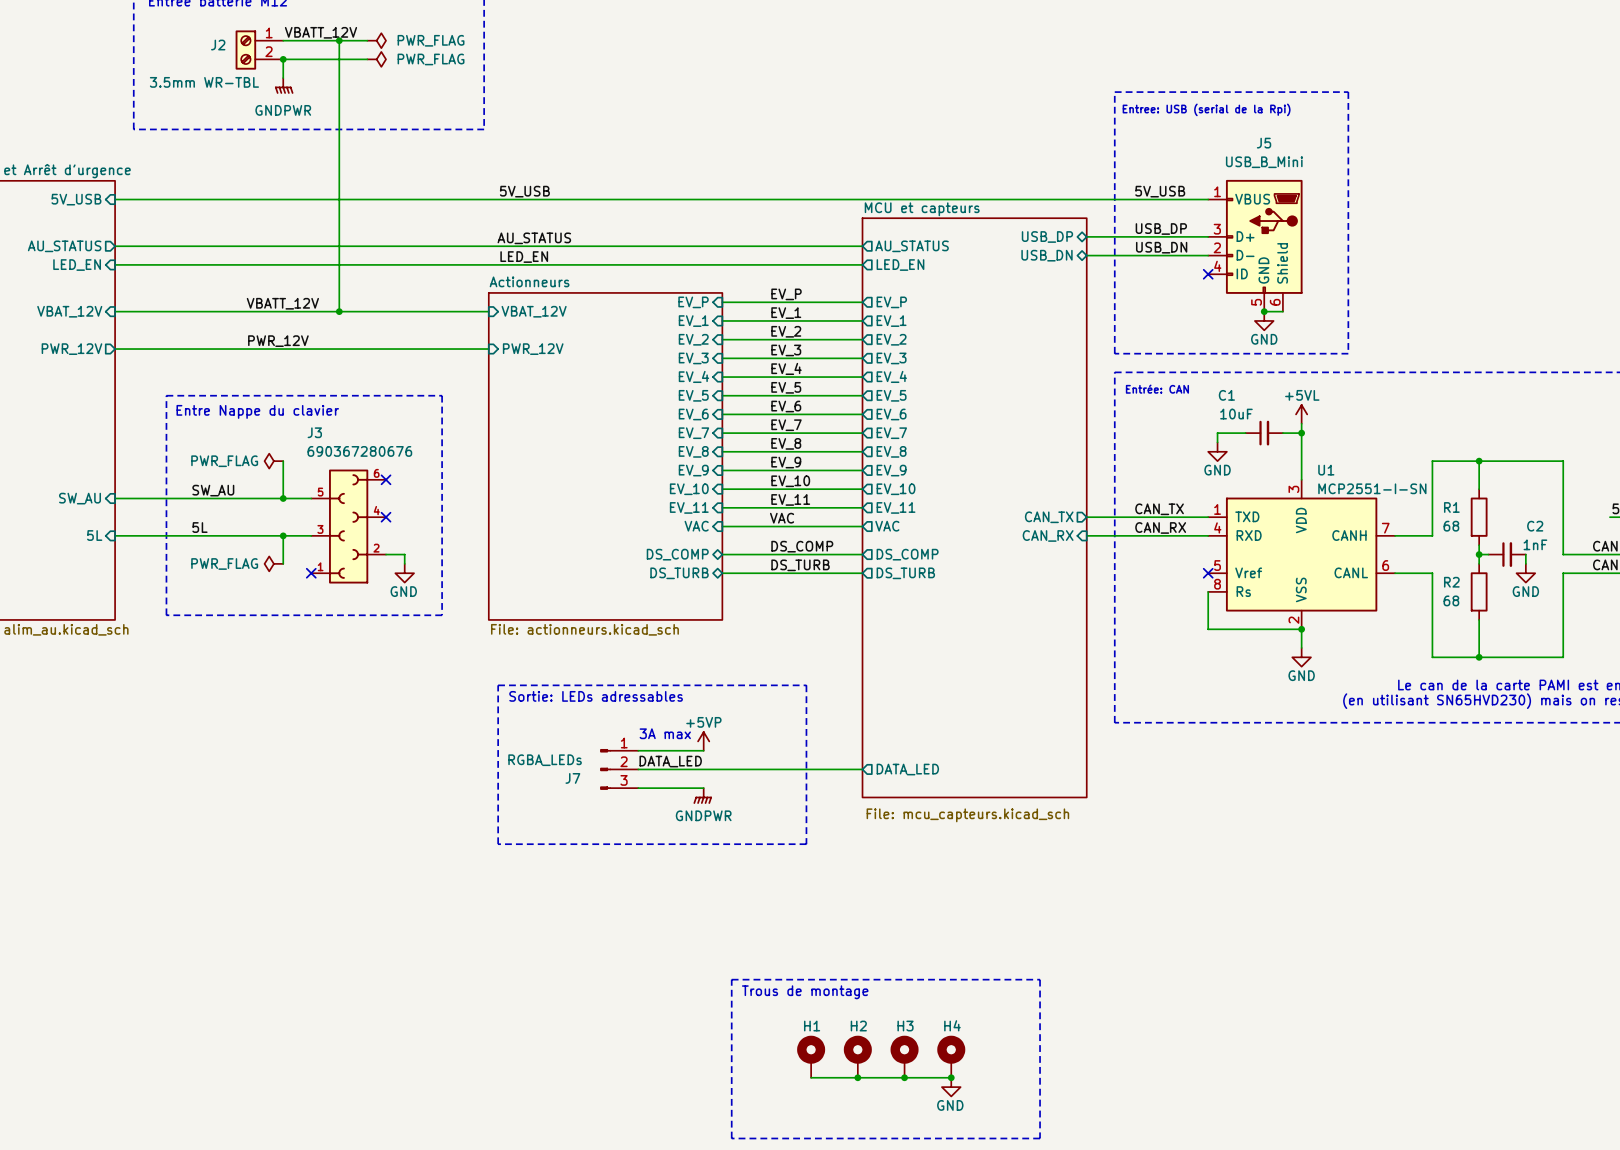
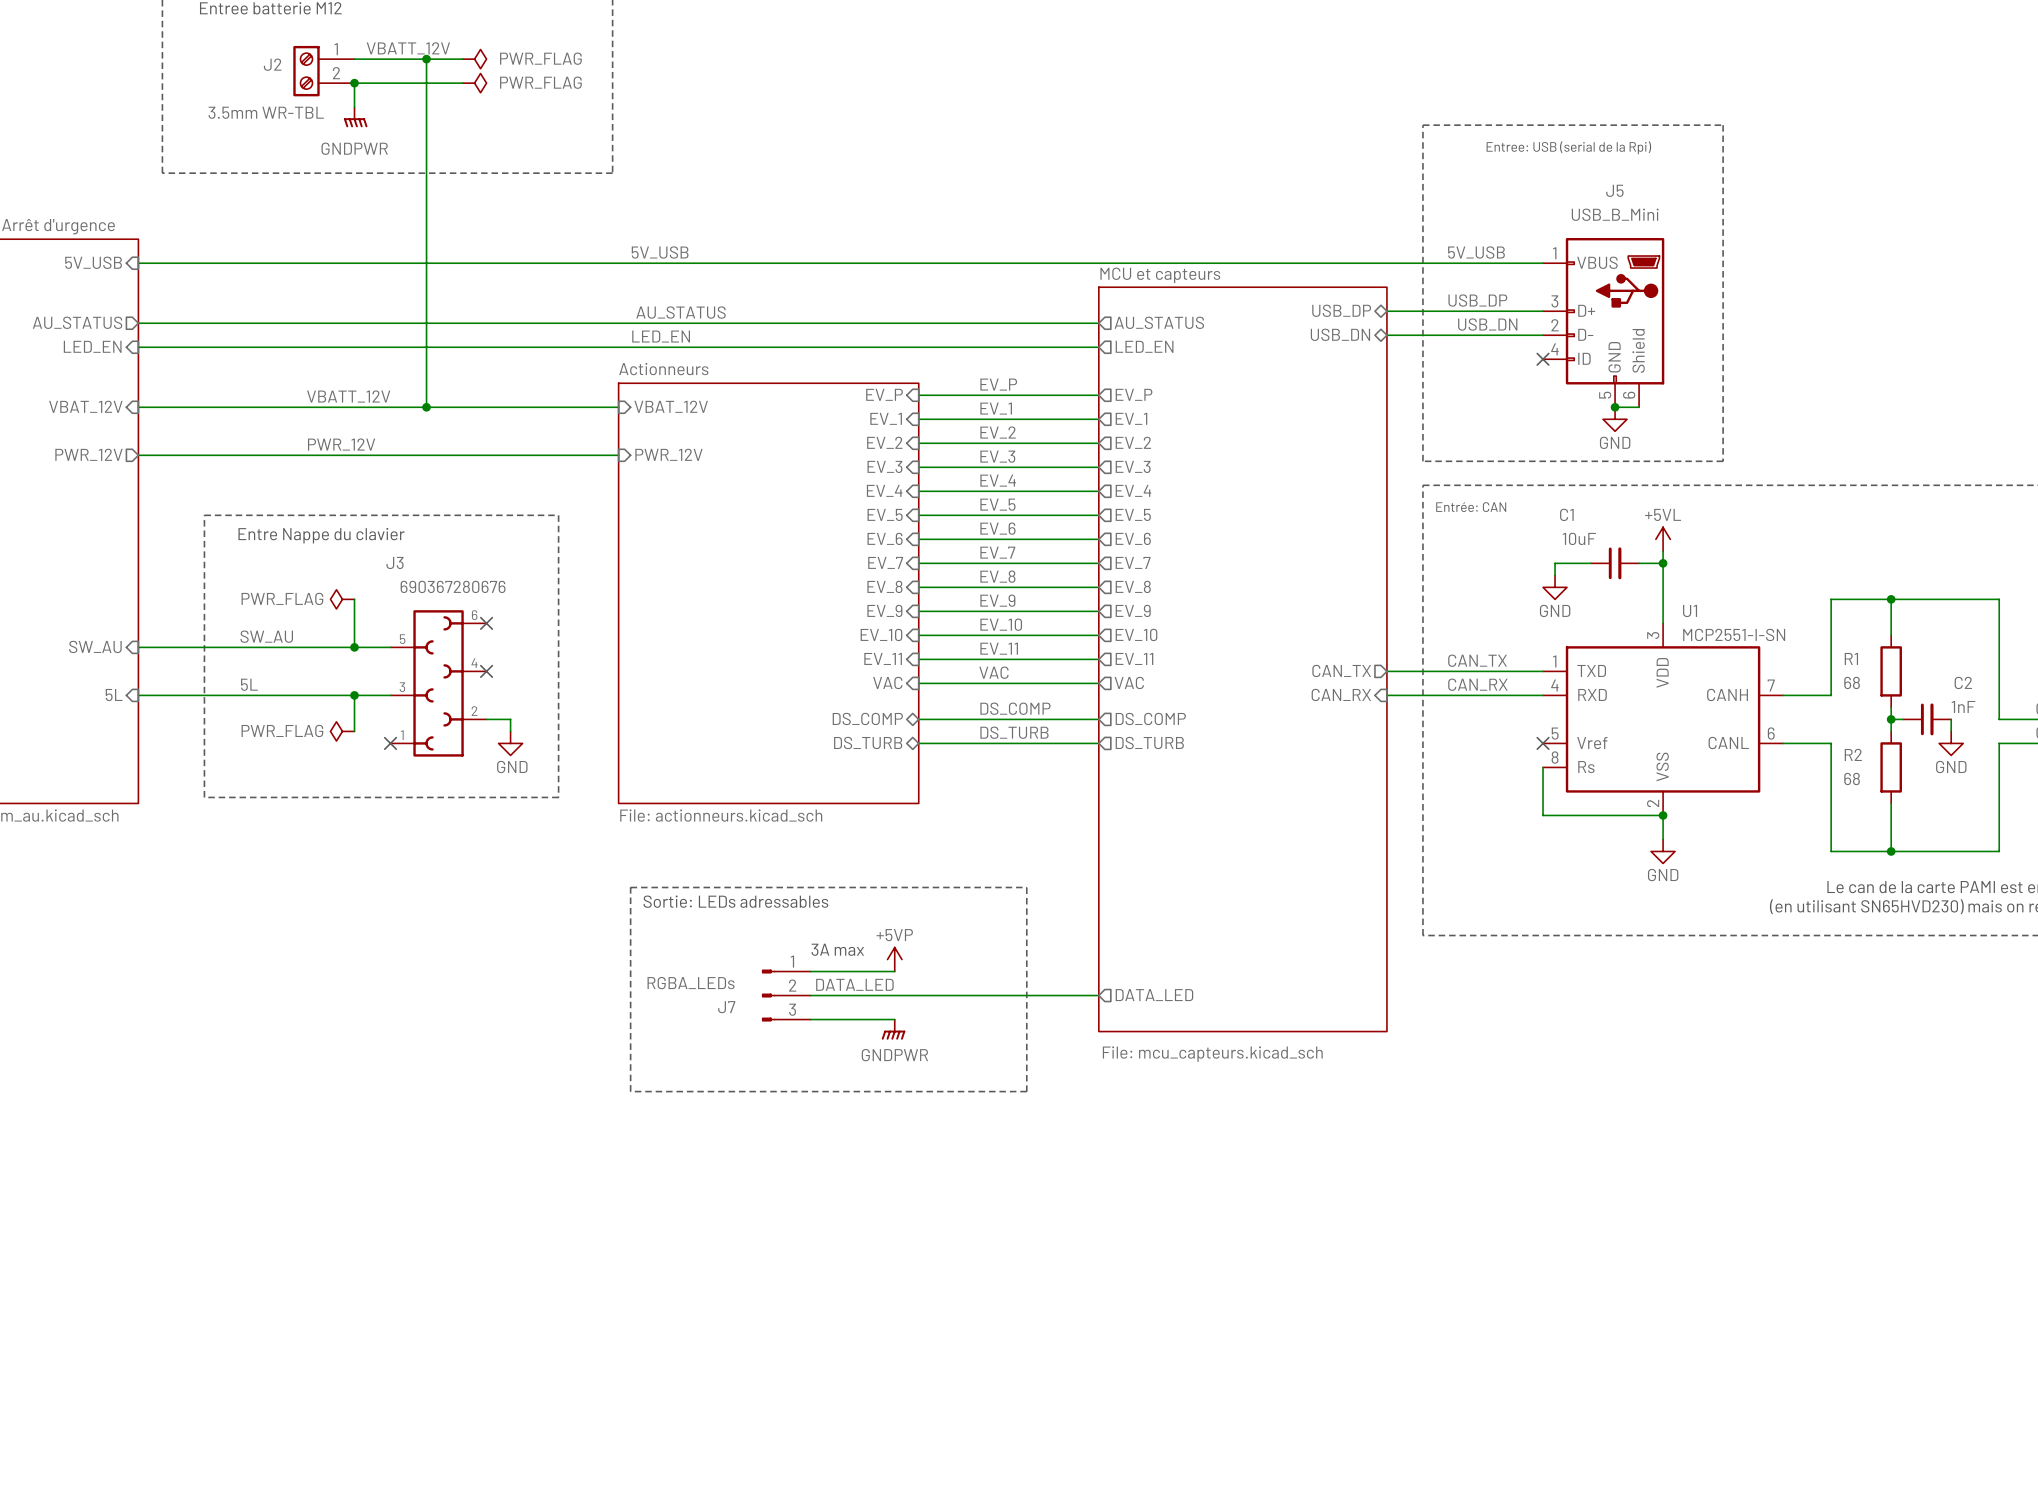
line: (731, 979) (1040, 979) (1040, 1138) (731, 1138) (731, 979) -> none
text: Trous de montage (805, 992) -> none
H1: (811, 1056) -> none
H2: (857, 1056) -> none
H3: (904, 1056) -> none
H4: (951, 1056) -> none
wire: (811, 1077) (951, 1077) -> none
junction: (857, 1077) -> none
junction: (904, 1077) -> none
junction: (951, 1077) -> none
power symbol: GND (951, 1087) -> none

